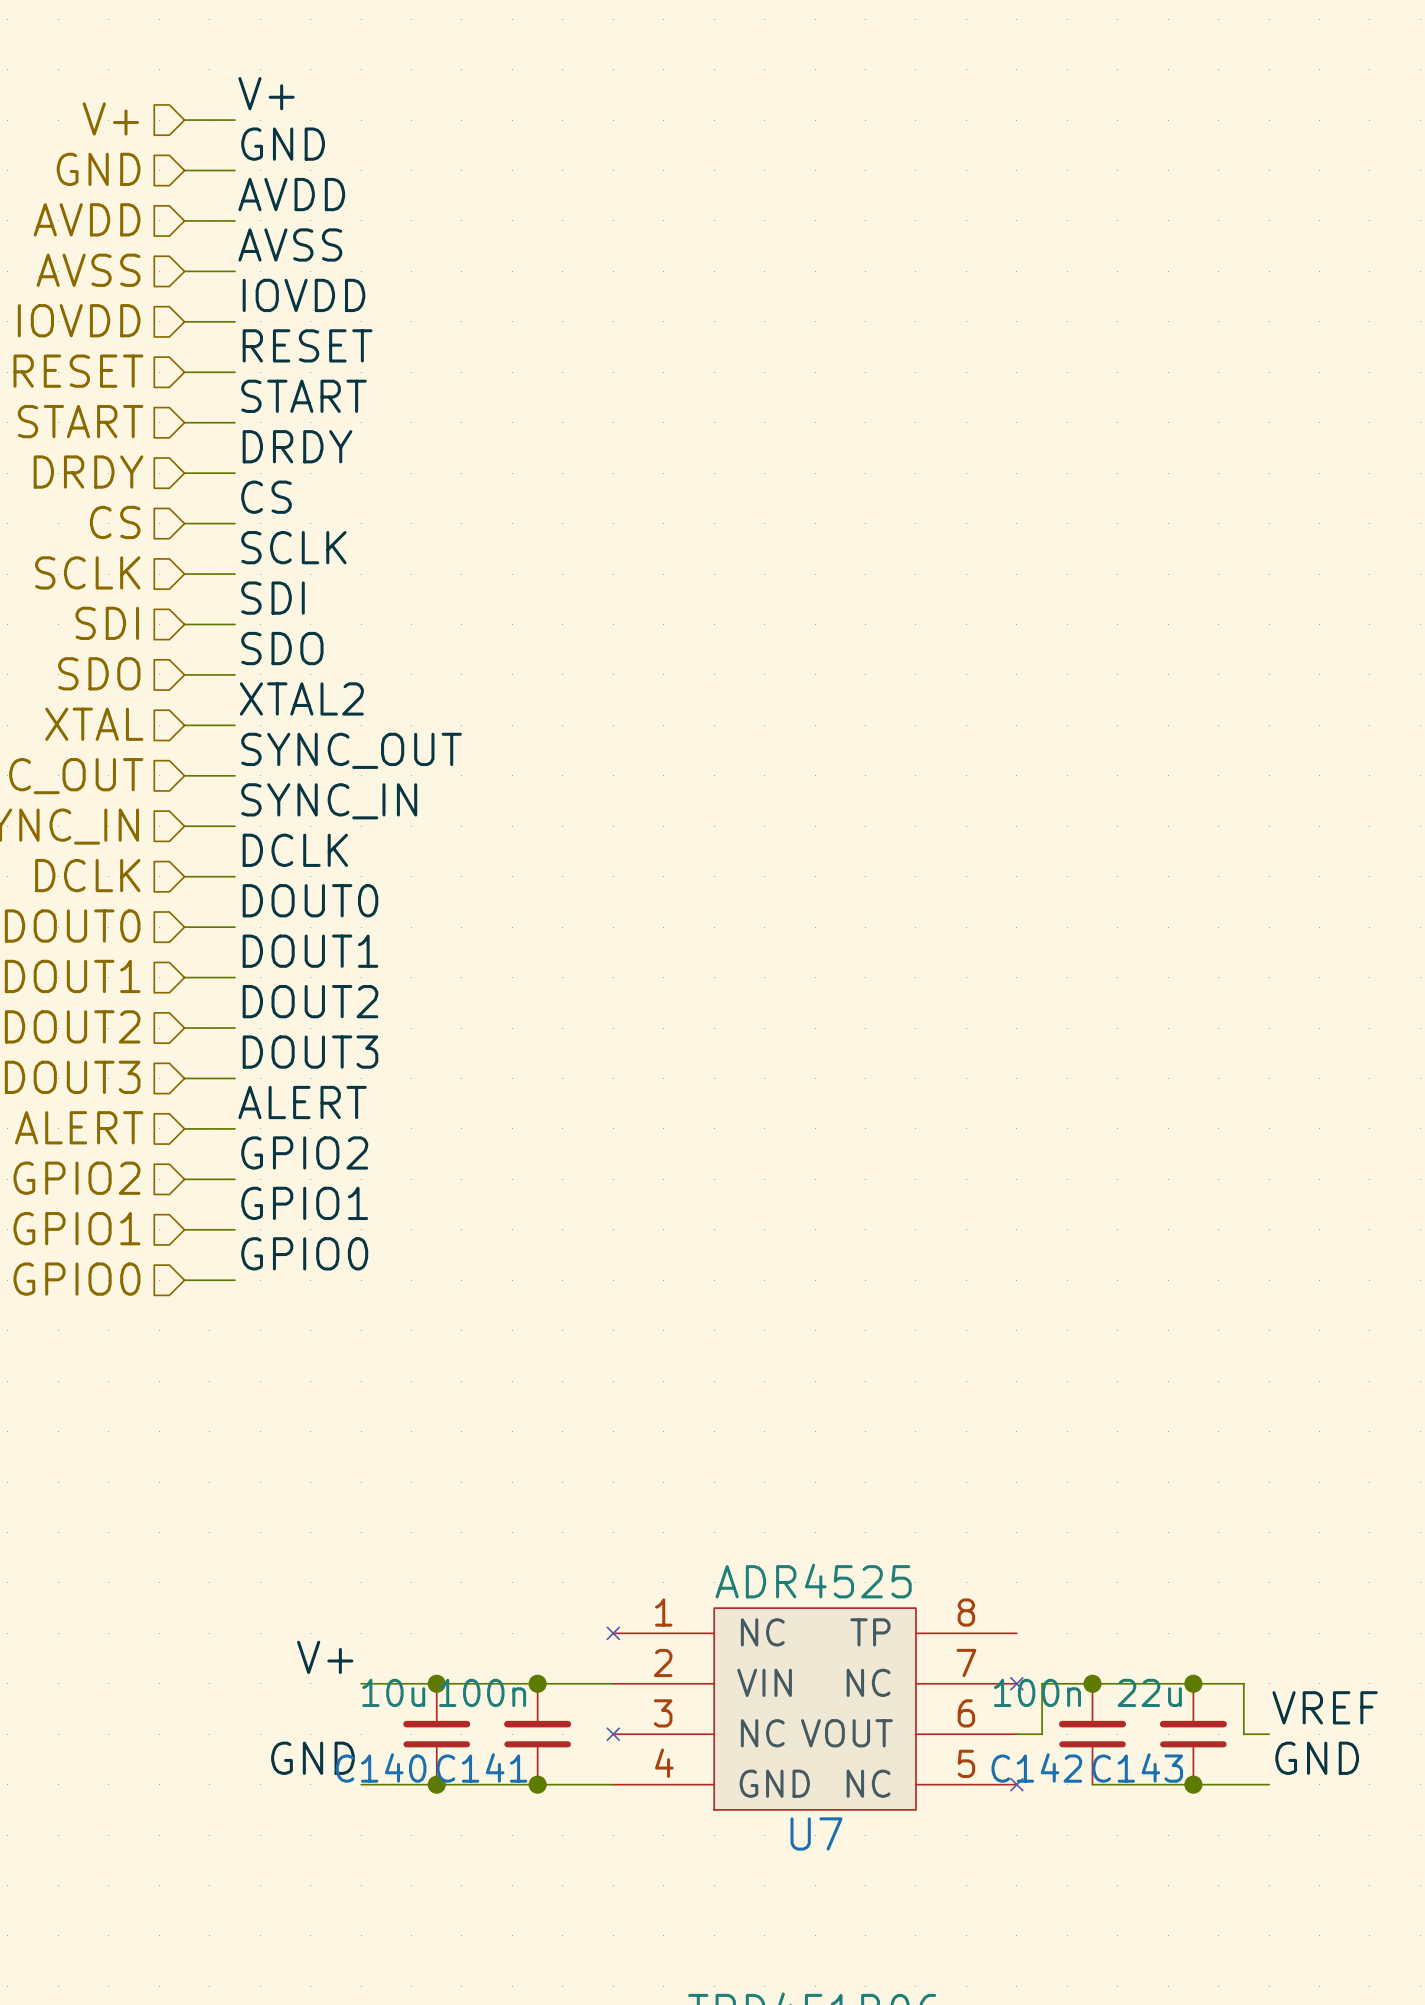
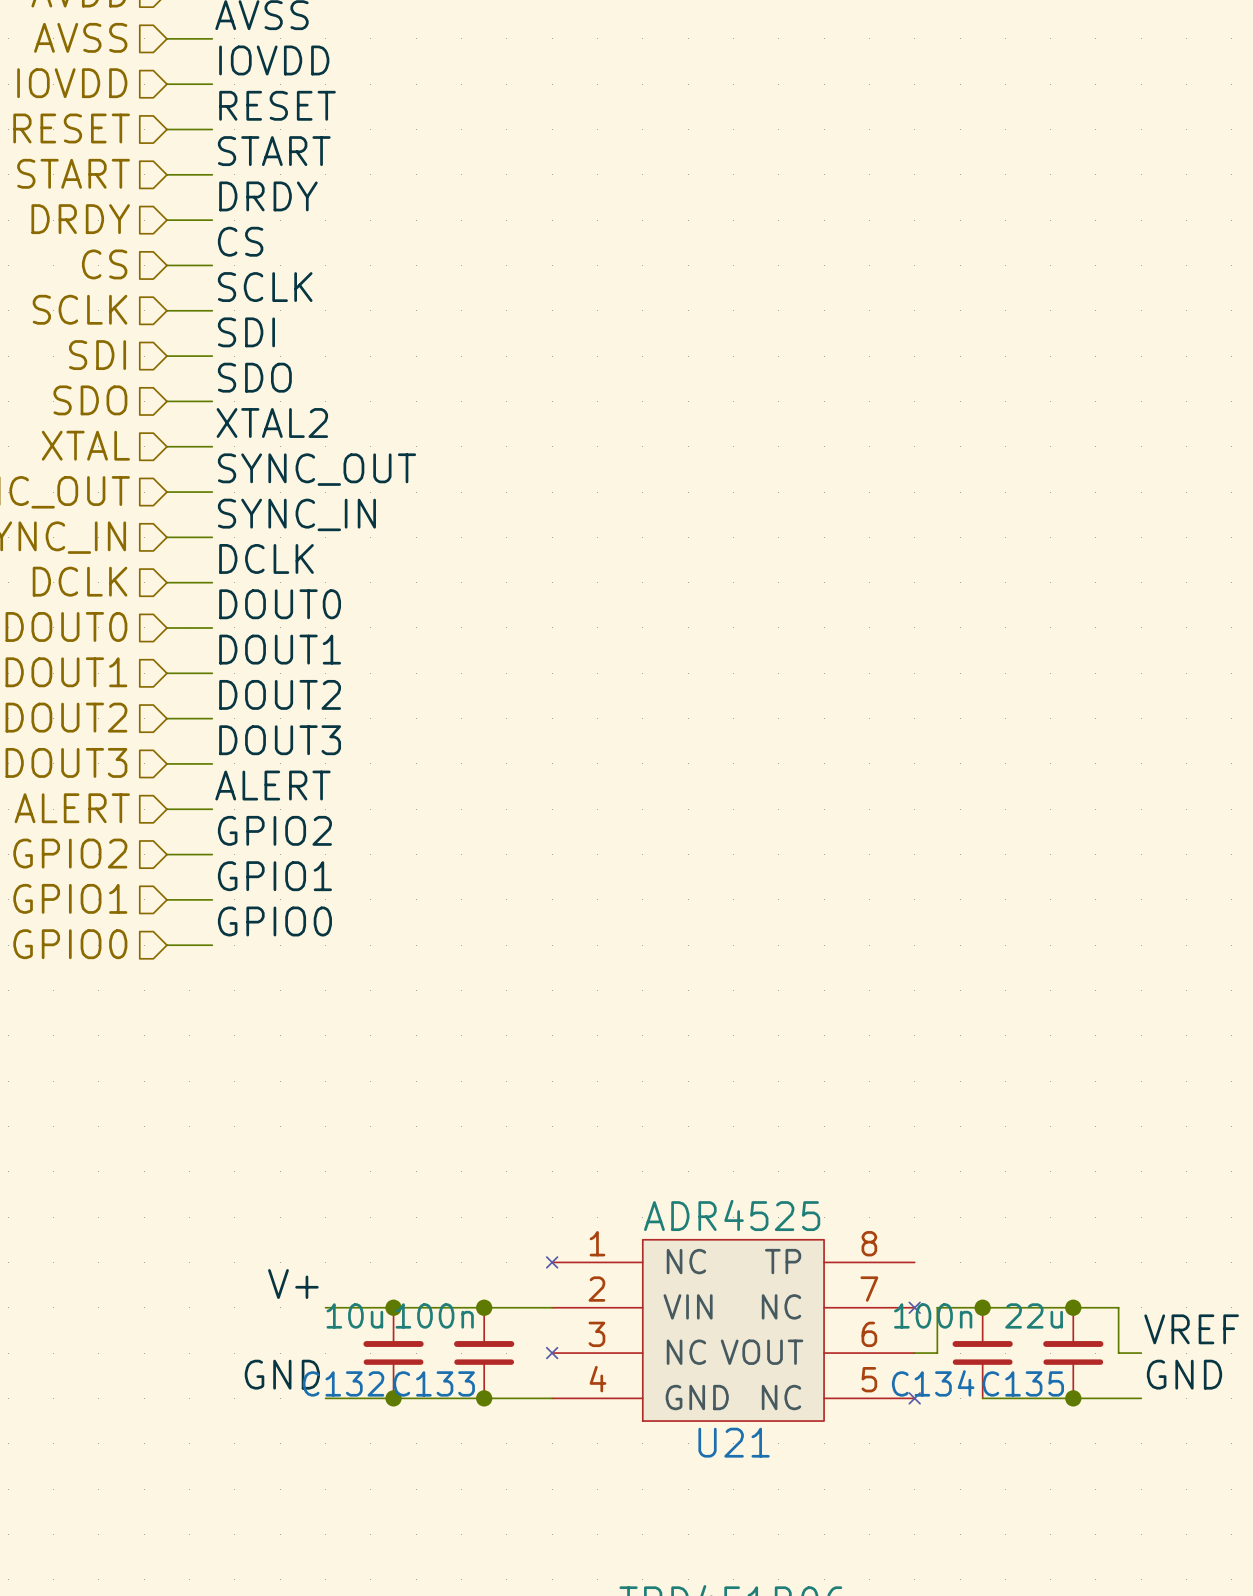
C140 name: C140 (381, 1767) -> C132 (343, 1383)
C141 name: C141 (481, 1767) -> C133 (434, 1383)
C142 name: C142 (1036, 1767) -> C134 (933, 1383)
C143 name: C143 (1137, 1767) -> C135 (1023, 1383)
U7 name: U7 (816, 1833) -> U21 (734, 1442)

